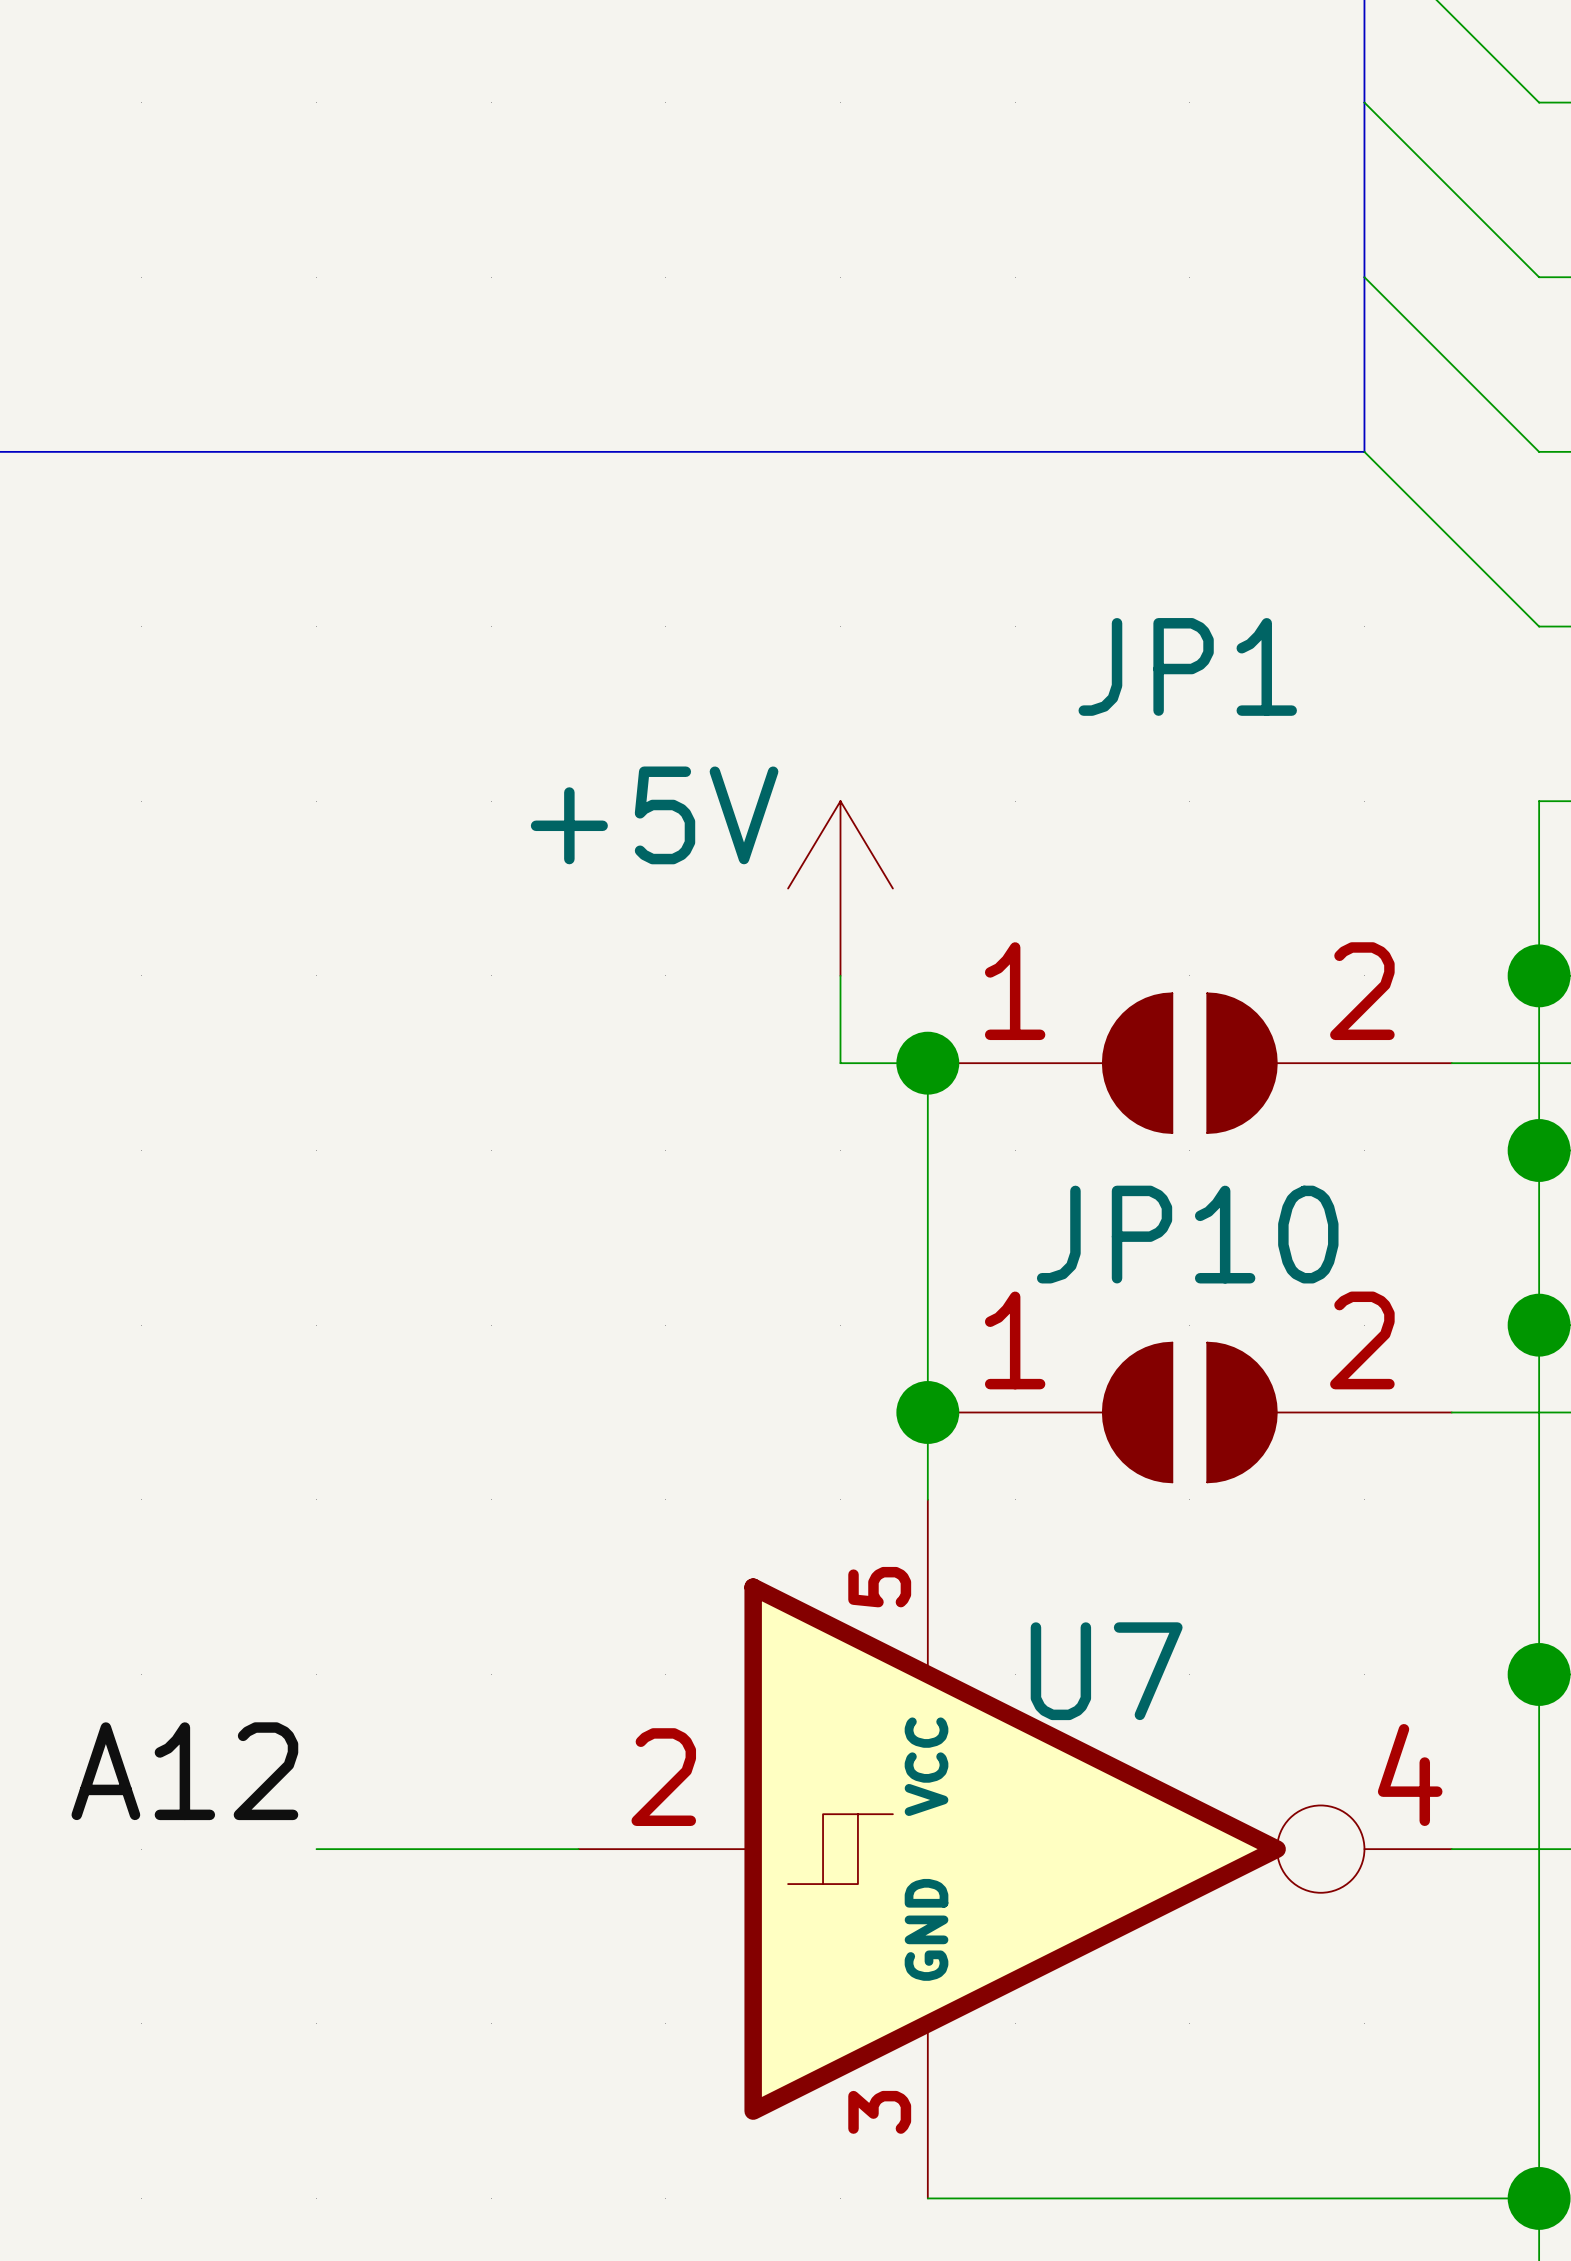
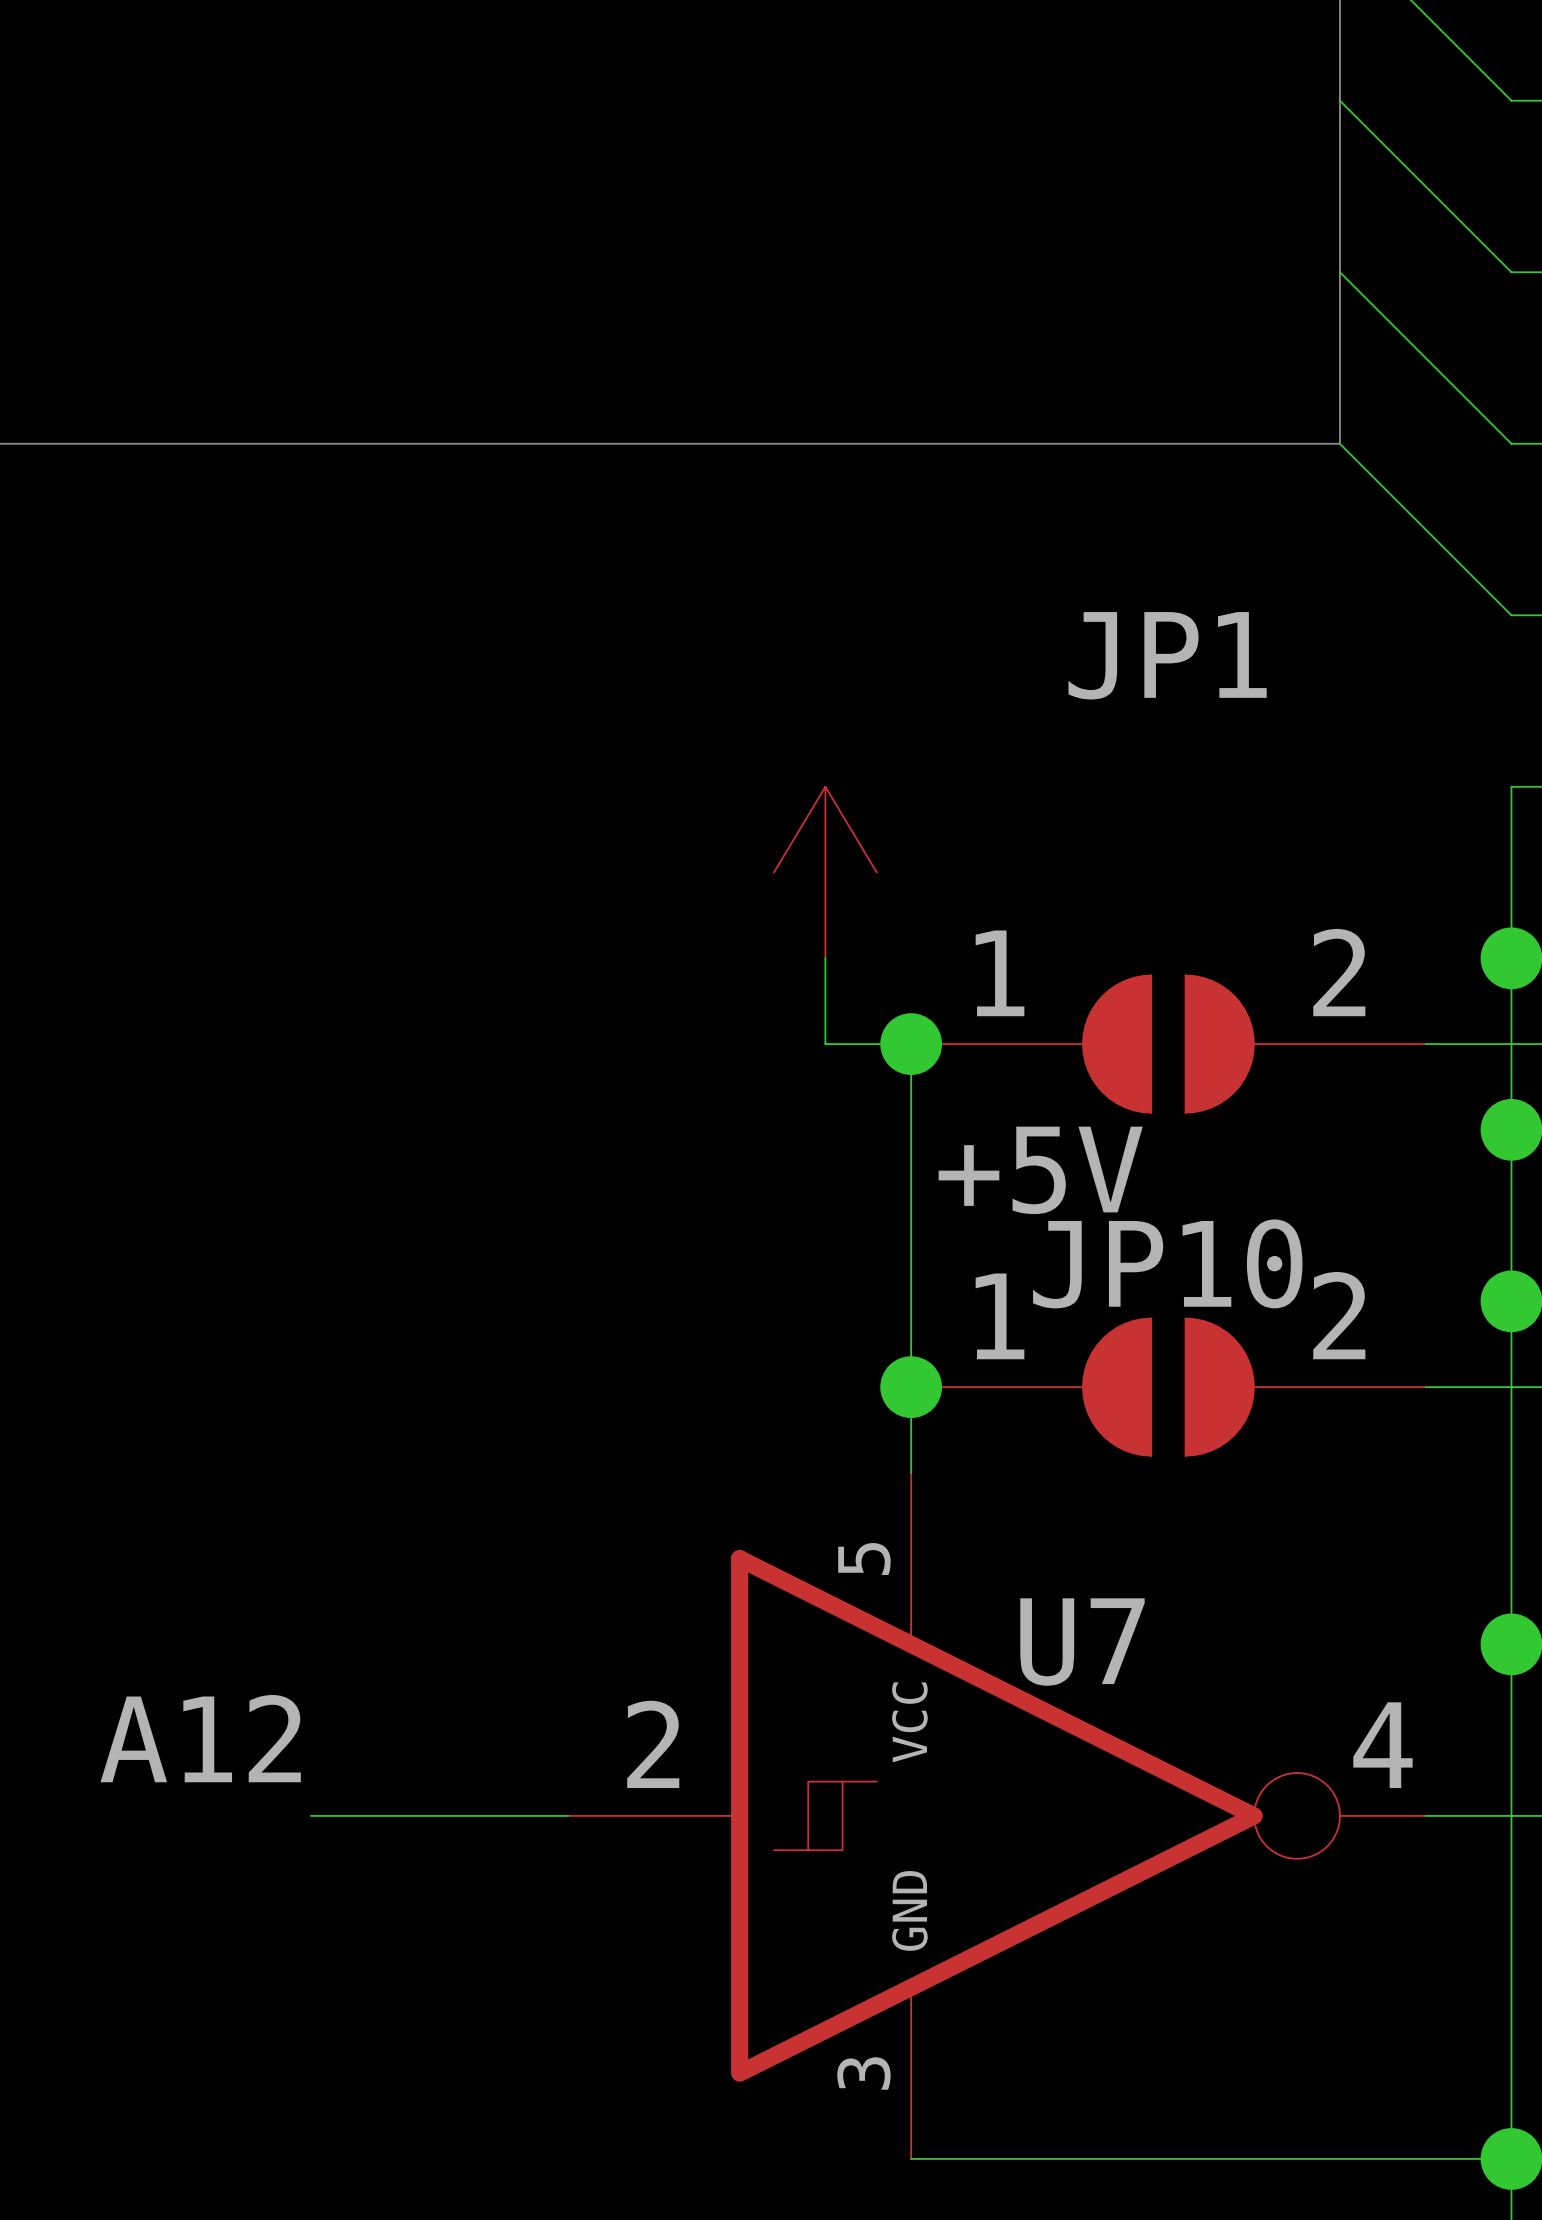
power symbol text position: +5V (654, 815) -> +5V (1040, 1170)
JP10 name position: JP10 (1187, 1234) -> JP10 (1167, 1263)

